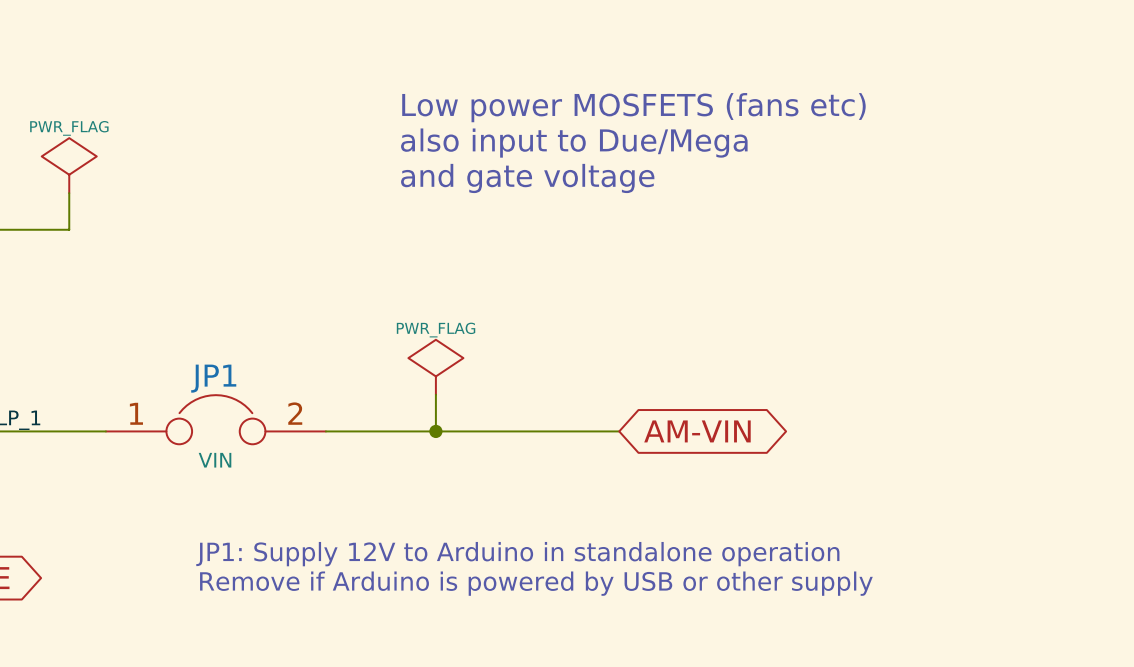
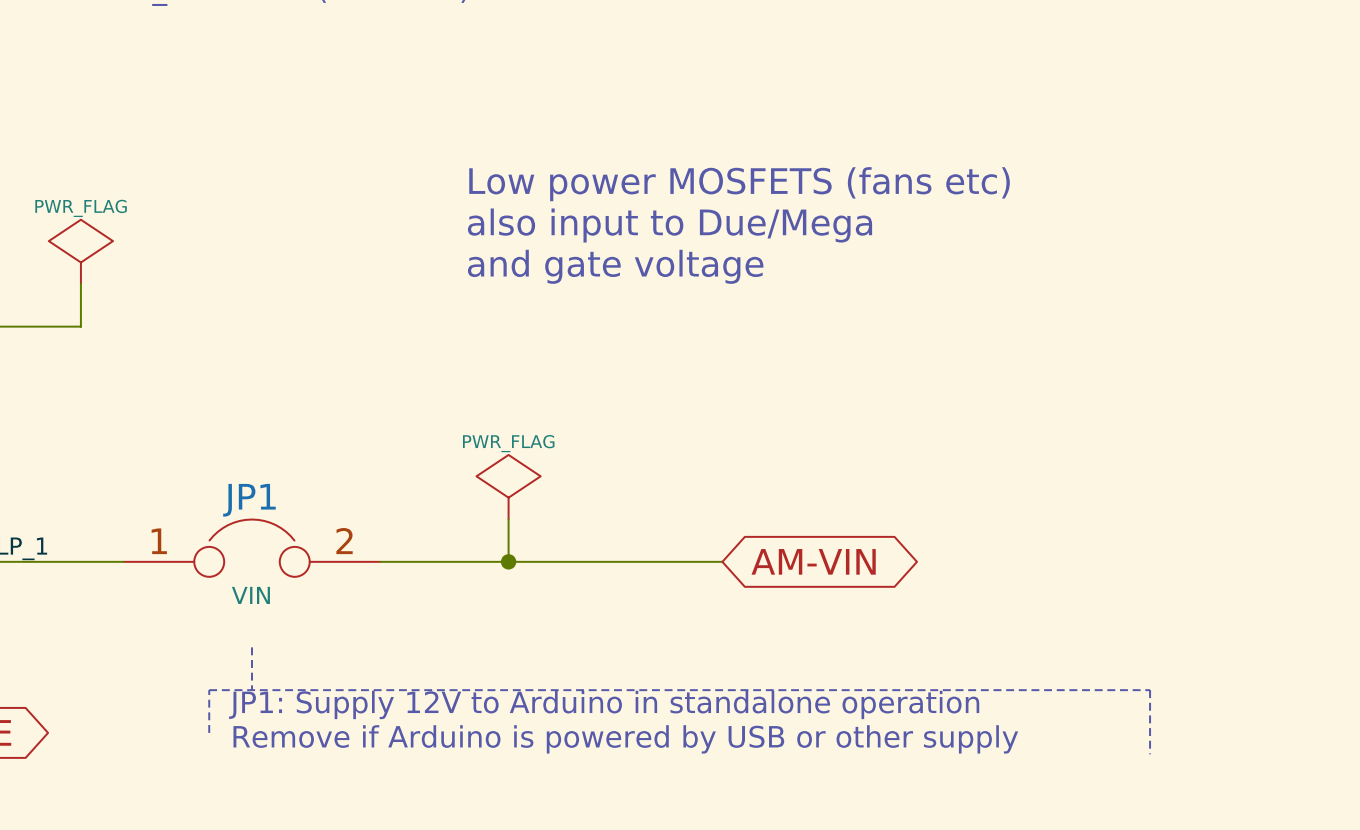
line: none -> (251, 647) (251, 690)
line: none -> (209, 732) (209, 690) (1150, 690) (1150, 754)

